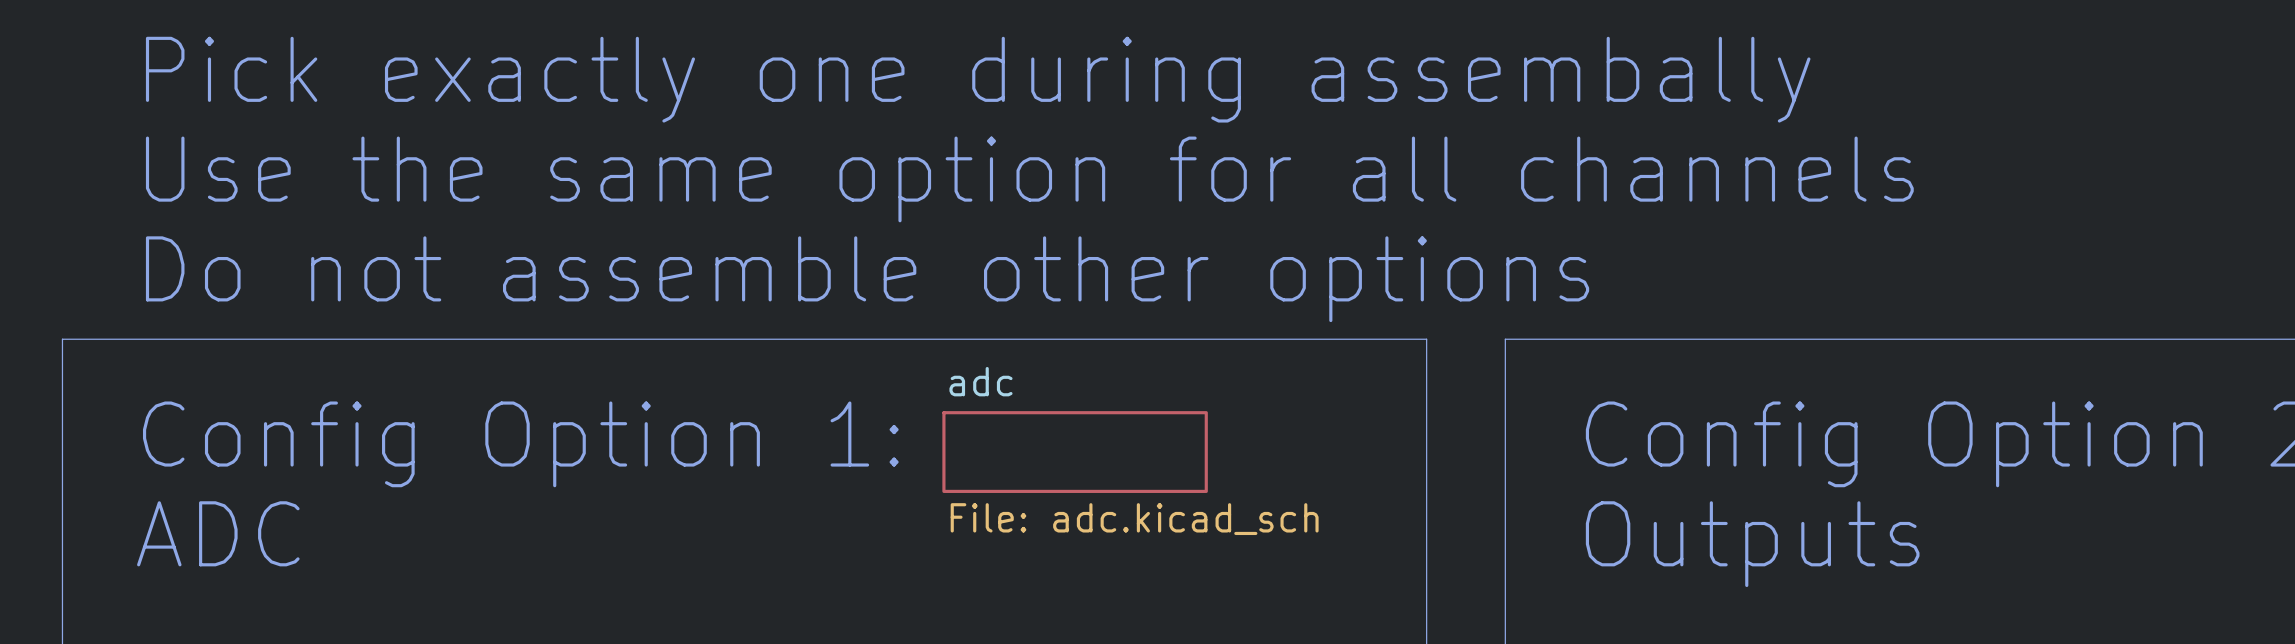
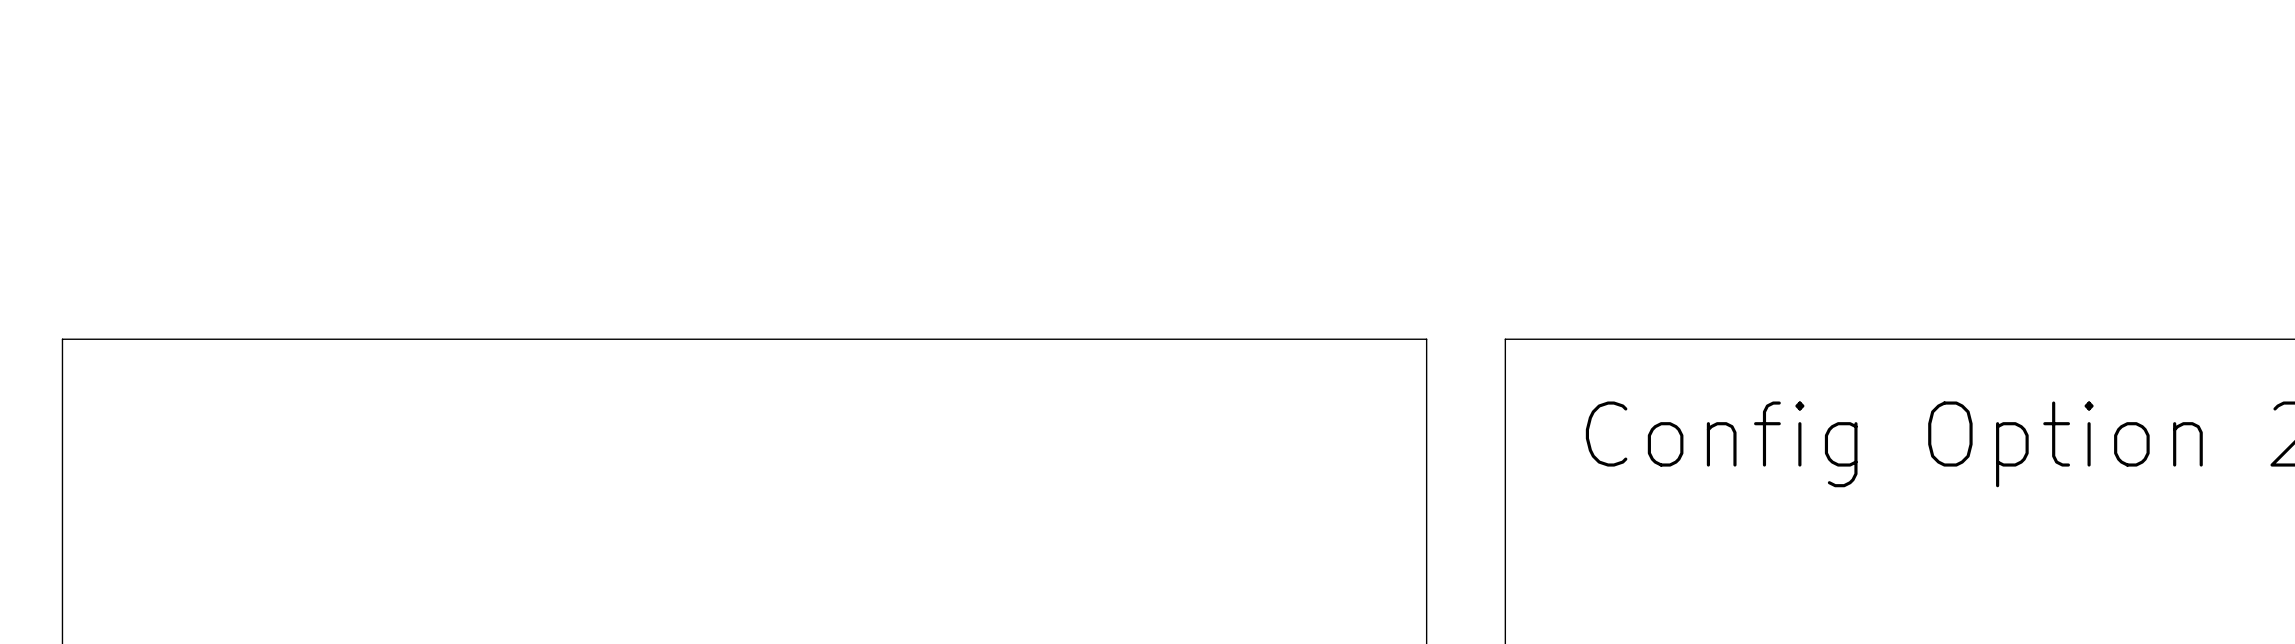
text: Pick exactly one during assembally (978, 79) -> none
text: Use the same option for all channels (1029, 179) -> none
text: Do not assemble other options (867, 279) -> none
text: Config Option 1: (520, 444) -> none
sheet adc: File: adc.kicad_sch (1075, 452) -> none
text: ADC (218, 533) -> none
text: Outputs (1752, 544) -> none

